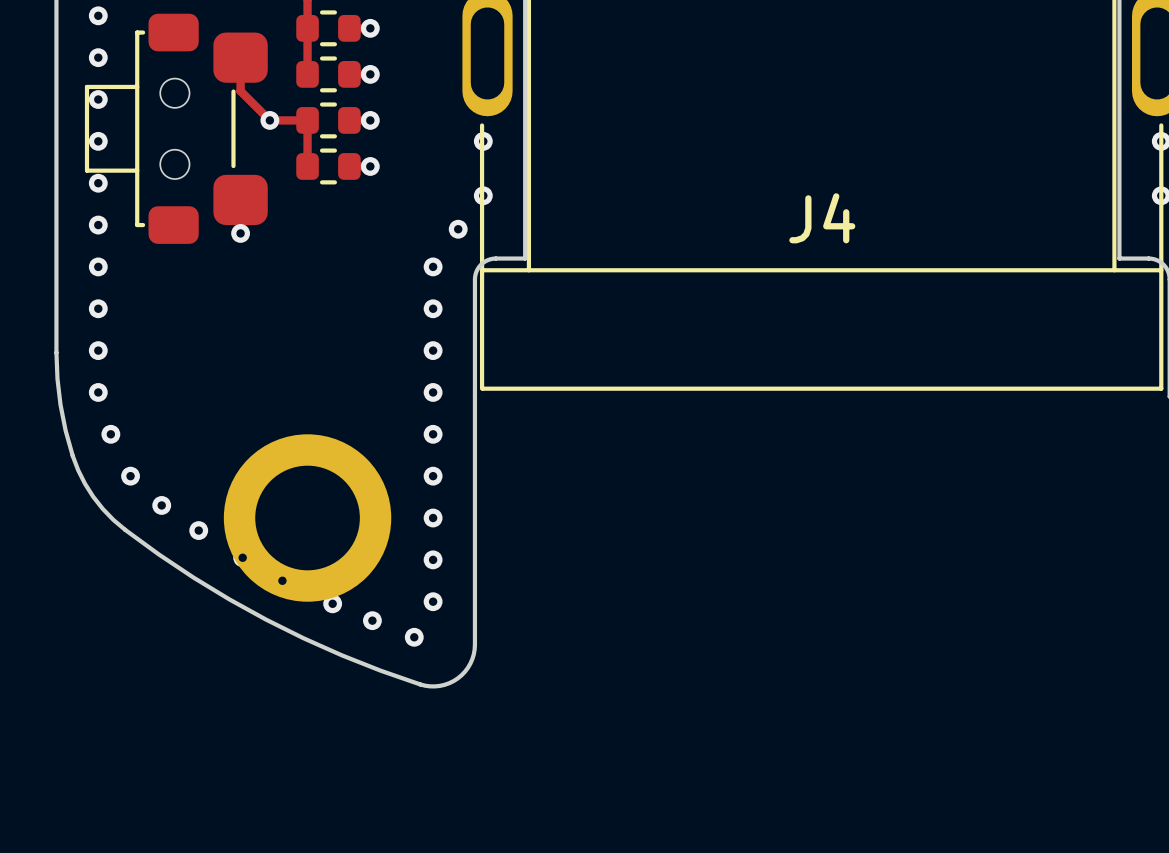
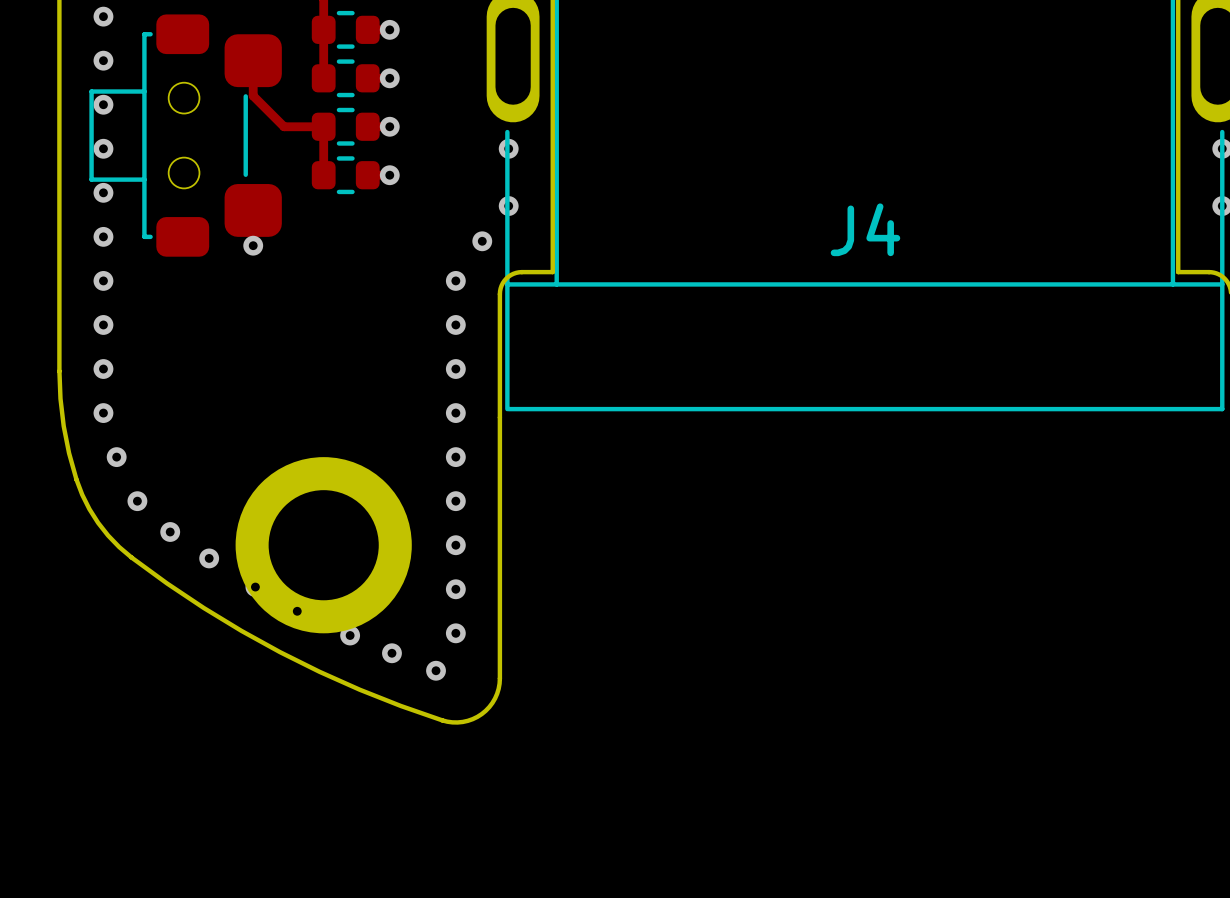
via: (269, 120) -> none

